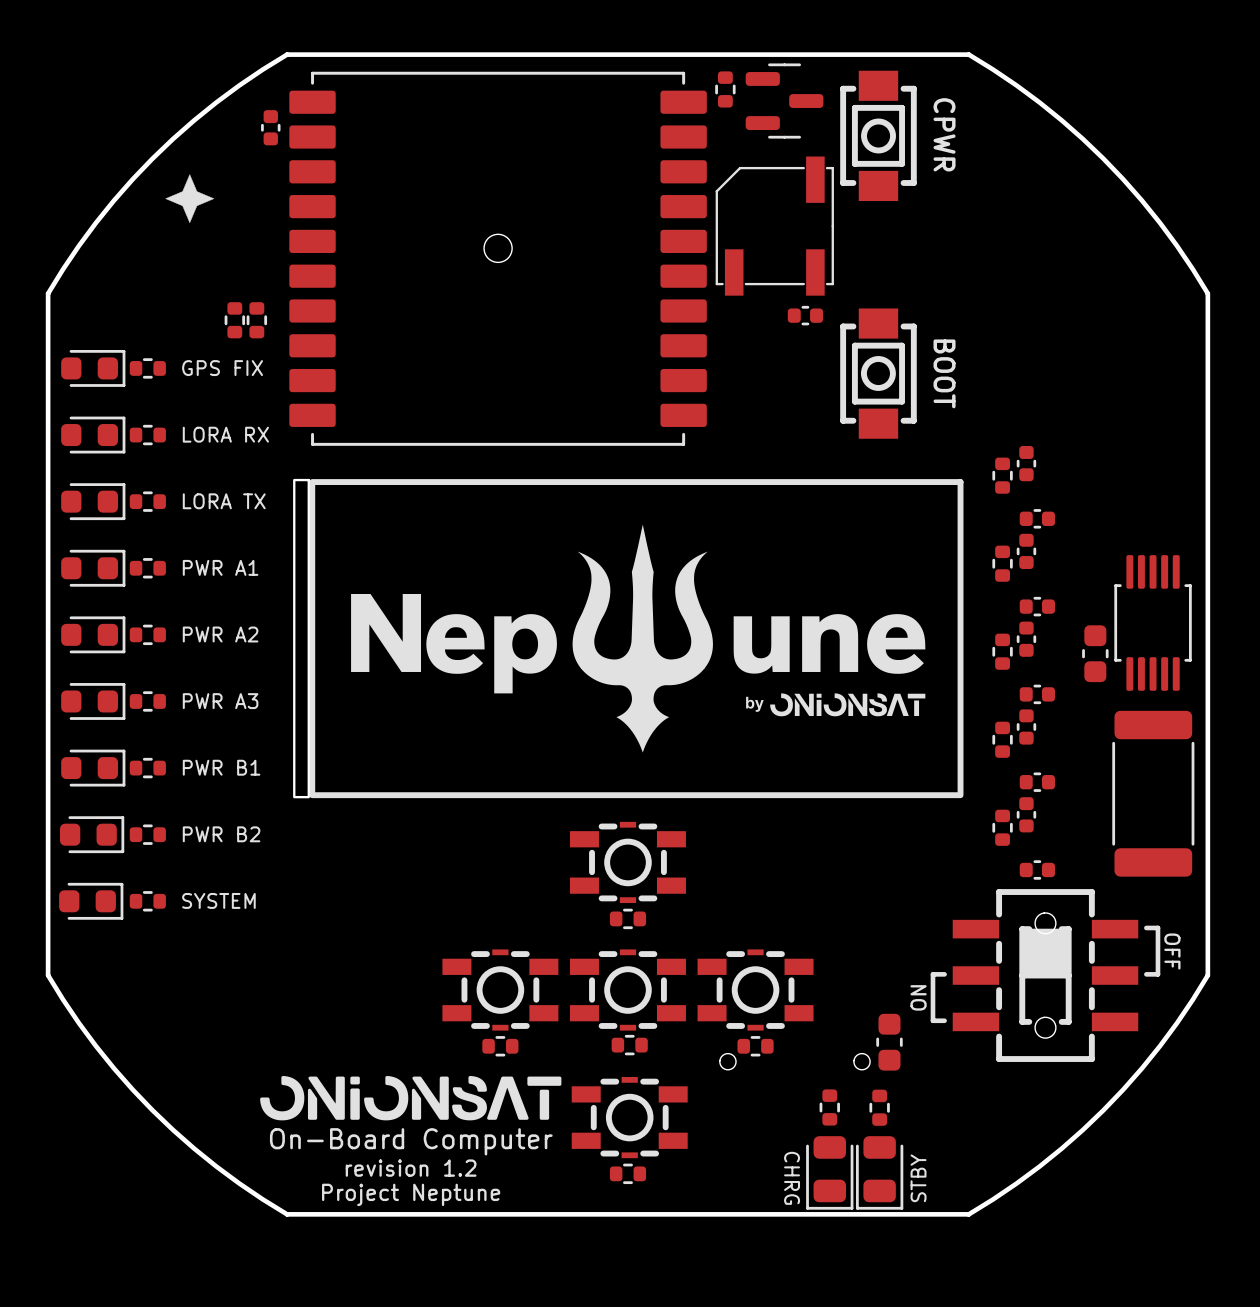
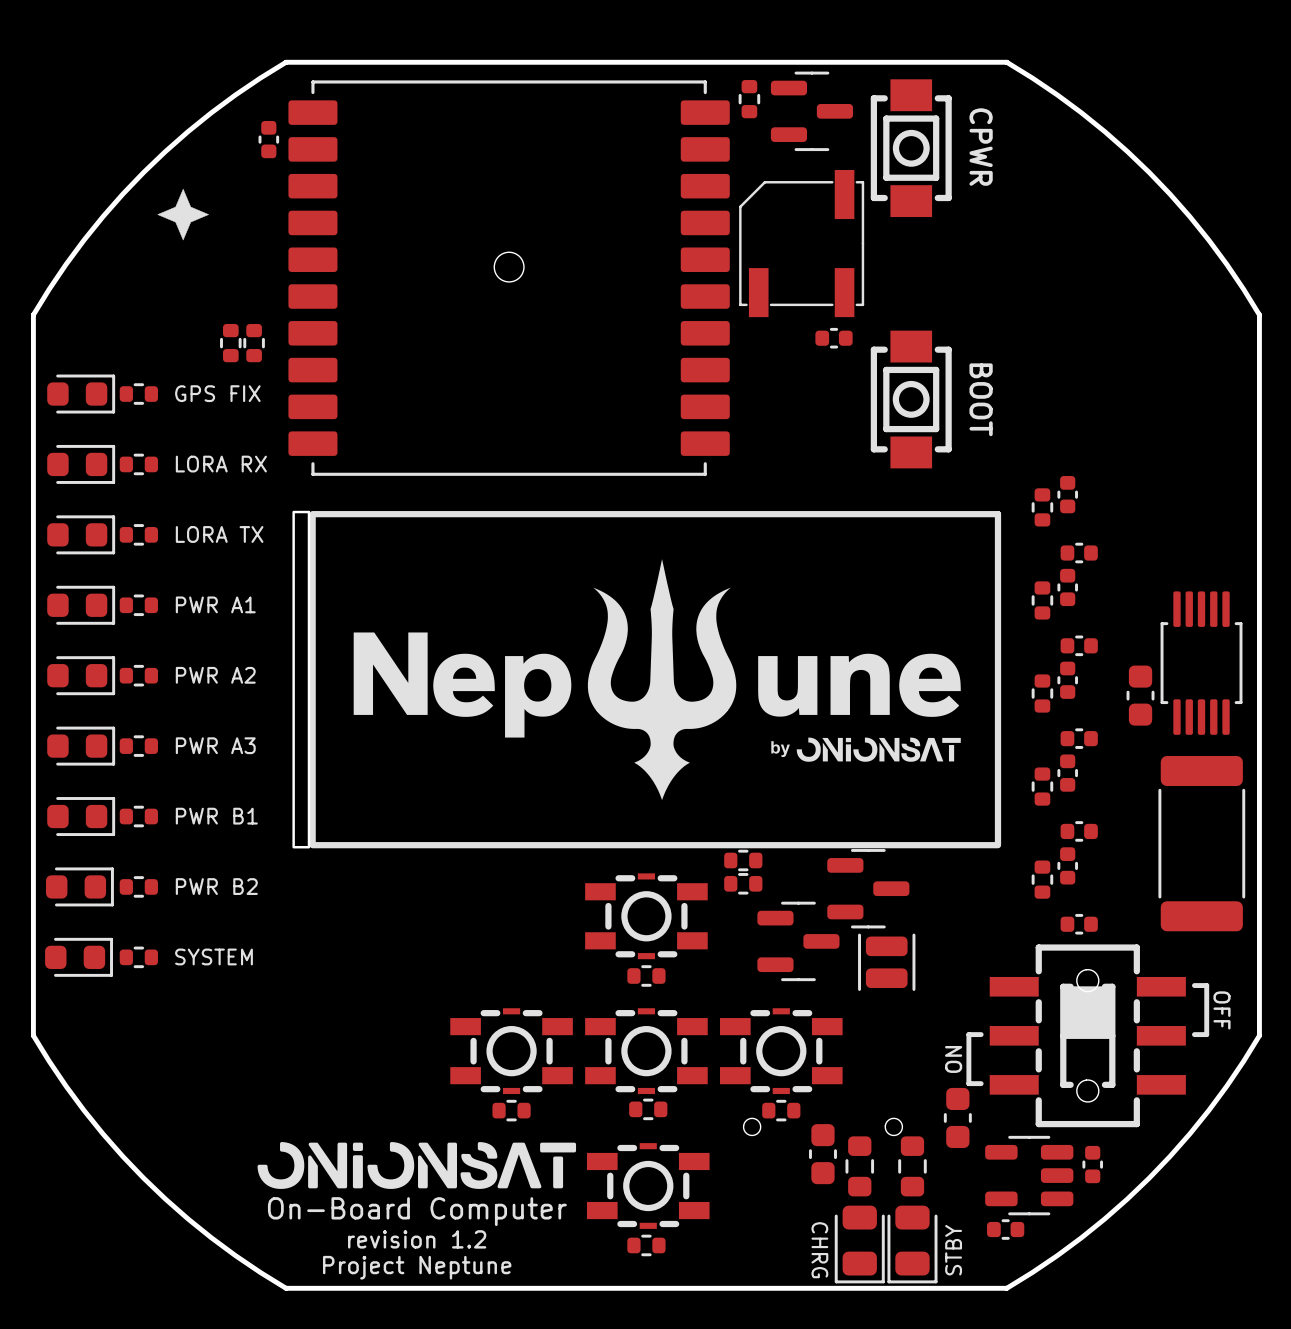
part: none -> (743, 860)
part: none -> (743, 883)
part: none -> (868, 888)
part: none -> (798, 941)
part: none -> (886, 962)
part position: (889, 1042) -> (957, 1117)
part: none -> (822, 1154)
part footprint: [819, 1089, 840, 1126] -> [845, 1136, 875, 1197]
part footprint: [869, 1089, 890, 1126] -> [898, 1136, 927, 1197]
part: none -> (1092, 1164)
part: none -> (1029, 1175)
part: none -> (1005, 1229)

